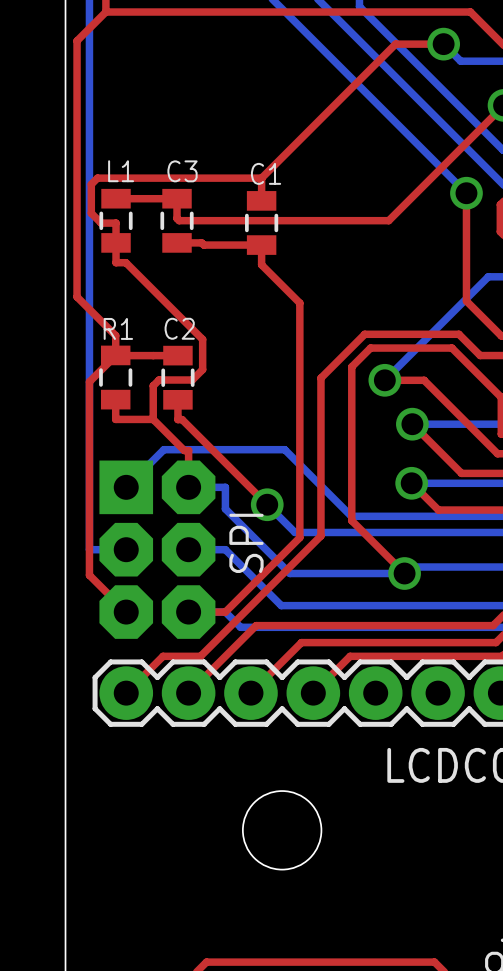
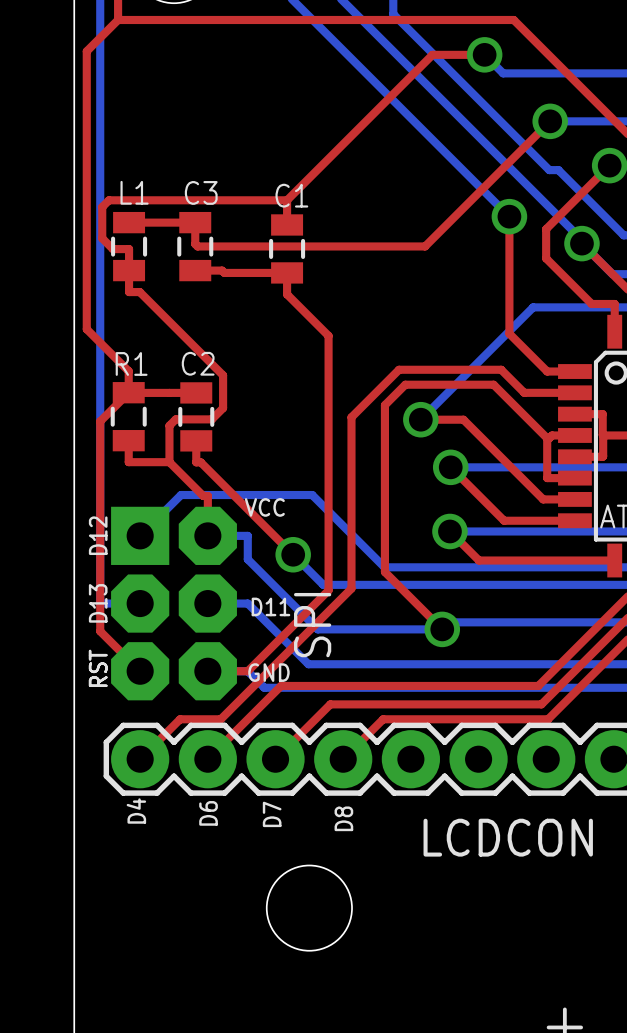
text: none -> VCC (264, 507)
text: none -> D12 (98, 535)
SPI name position: SPI (246, 543) -> SPI (312, 625)
text: none -> D13 (98, 603)
text: none -> D11 (270, 606)
text: none -> RST (98, 668)
text: none -> GND (268, 672)
text: none -> D4 (136, 811)
text: none -> D6 (208, 813)
text: none -> D7 (272, 814)
text: none -> D8 (343, 818)

